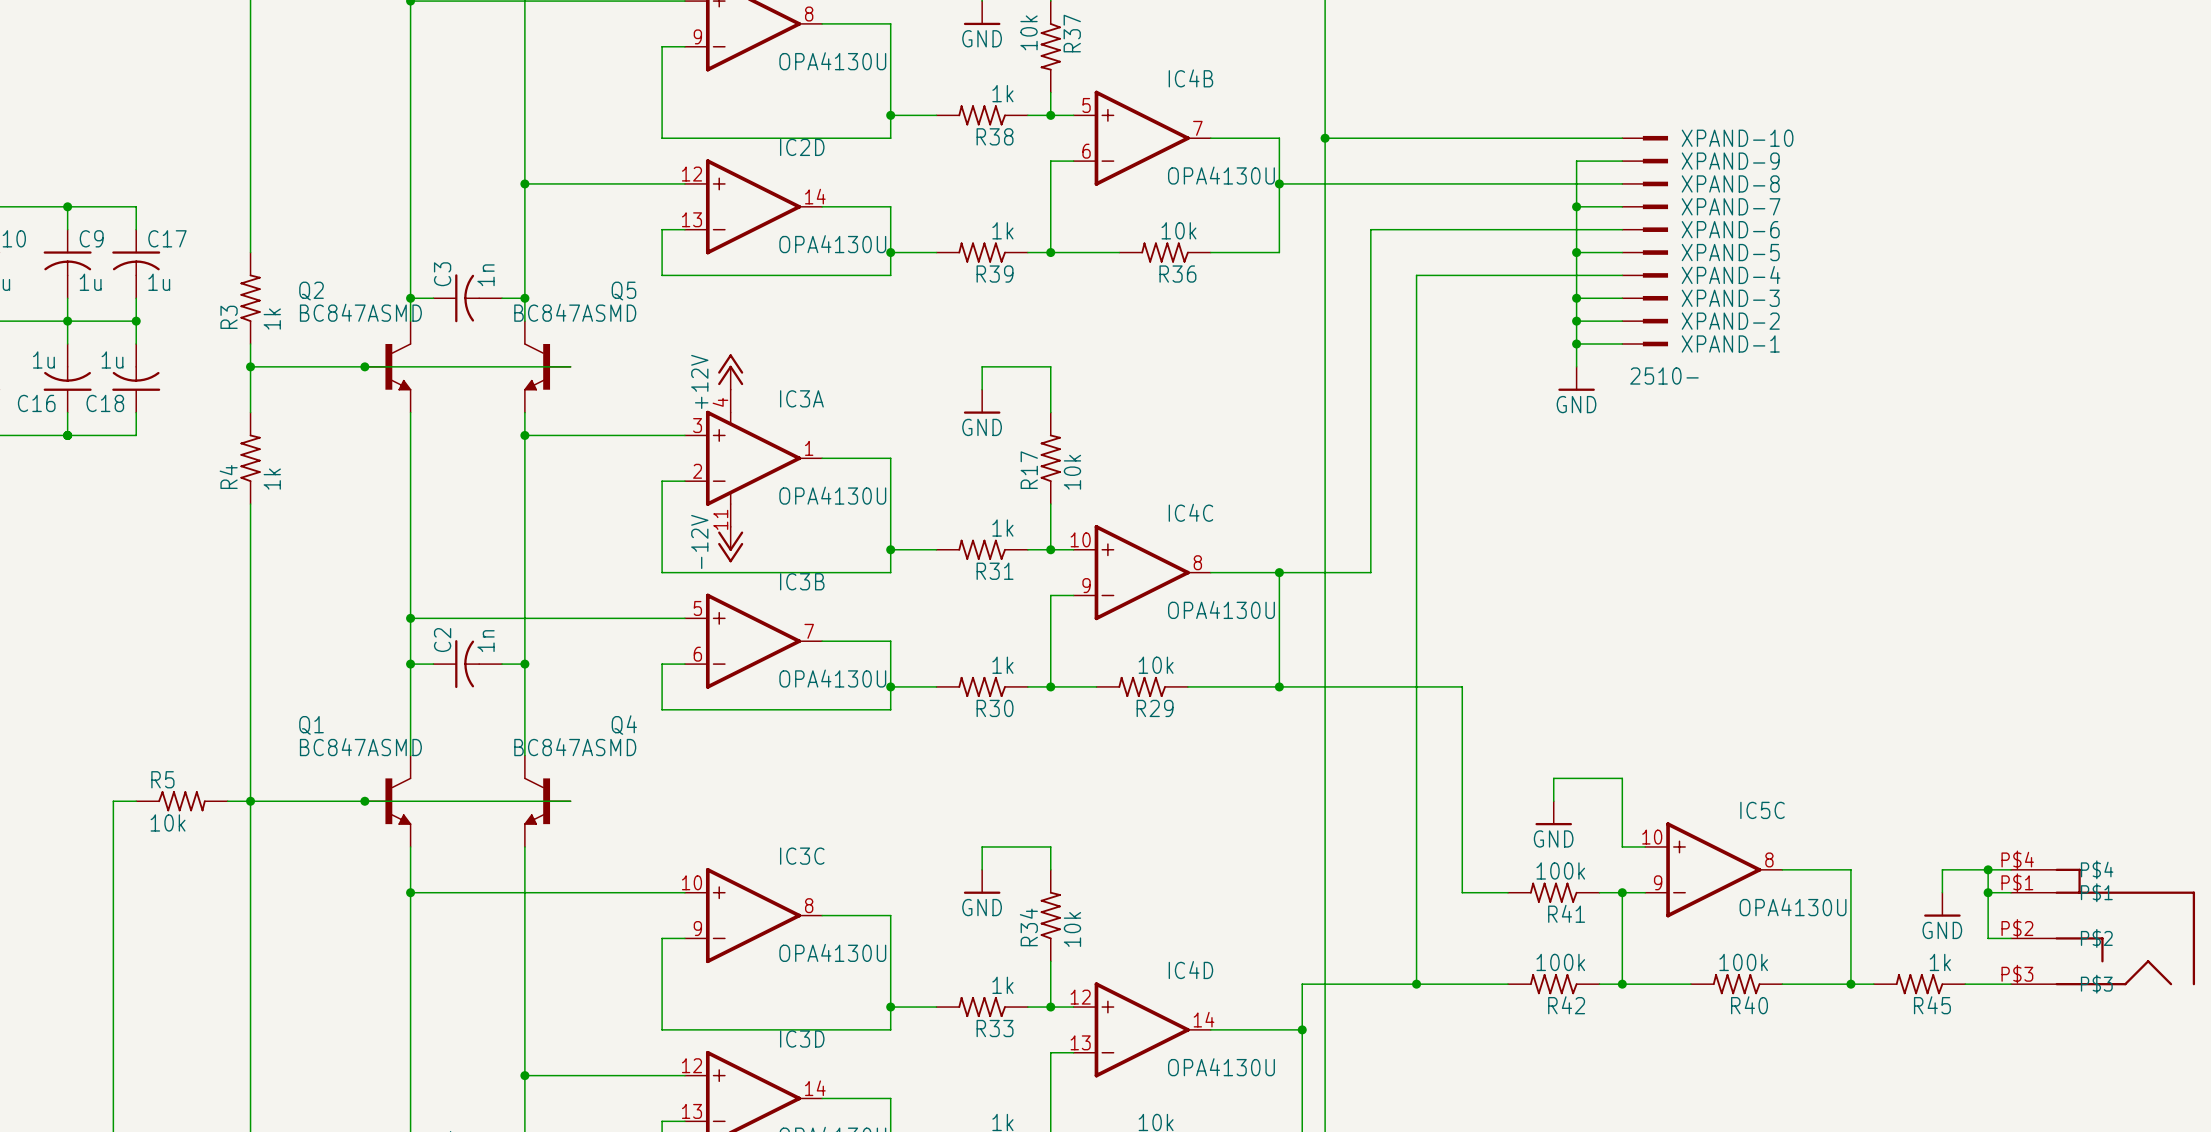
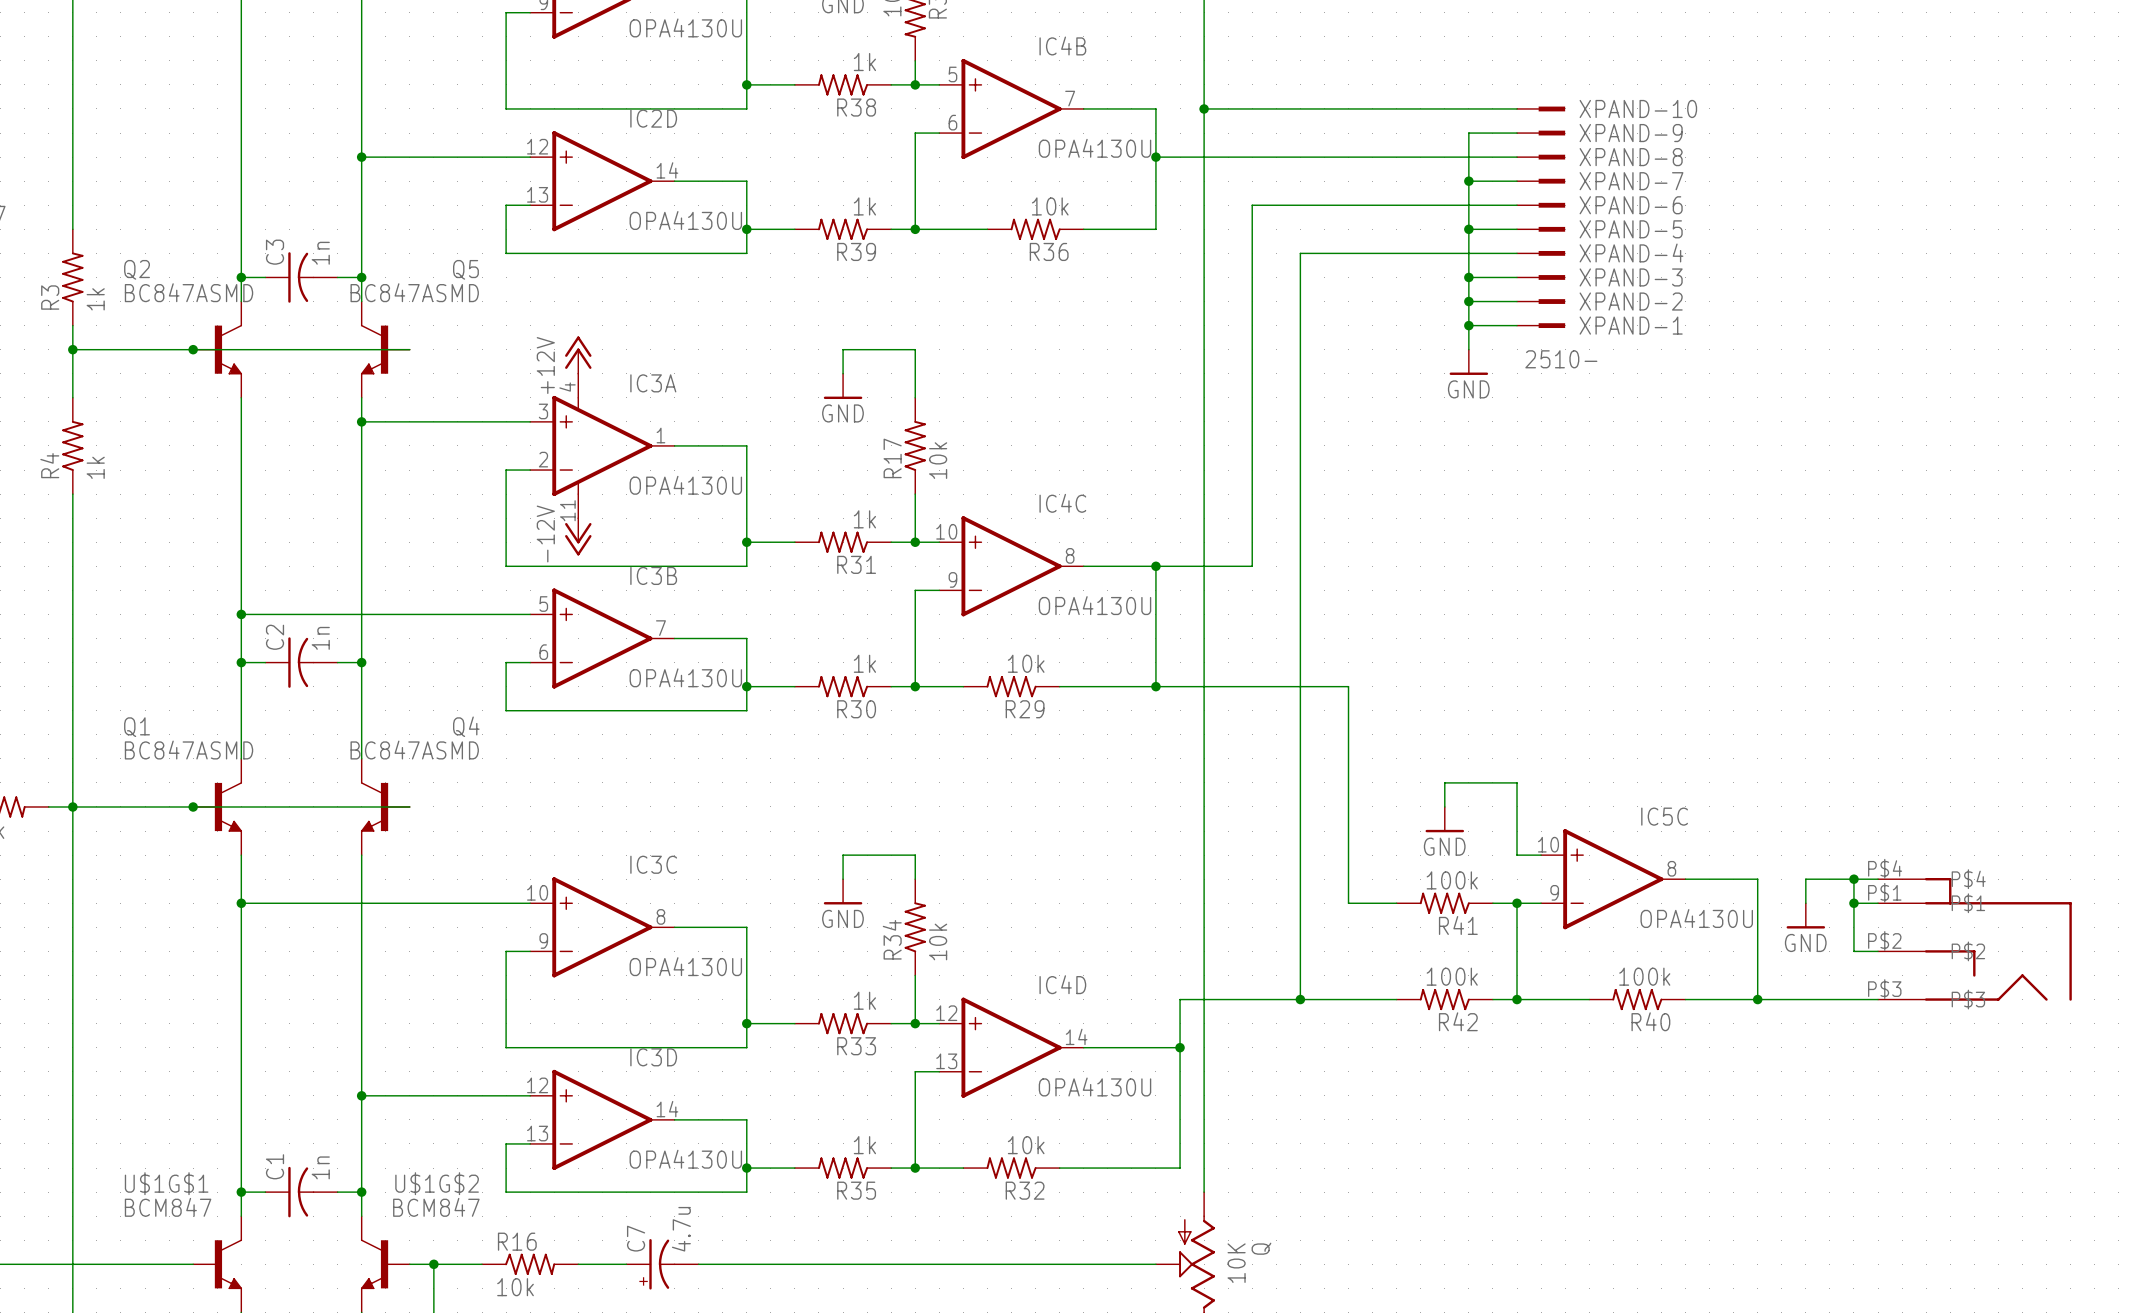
wire: none -> (1853, 879) (1805, 879) (1805, 903)
junction: none -> (1853, 879)
wire: (1988, 869) (1988, 938) (2010, 938) -> none
junction: (1988, 869) -> none
junction: none -> (1853, 903)
wire: none -> (1878, 903) (1853, 903) (1853, 951) (1878, 951)
junction: (1988, 892) -> none
power symbol position: GND (1942, 904) -> GND (1805, 915)
part position: (2103, 927) -> (1974, 939)
R45: 1k (1919, 984) -> none

